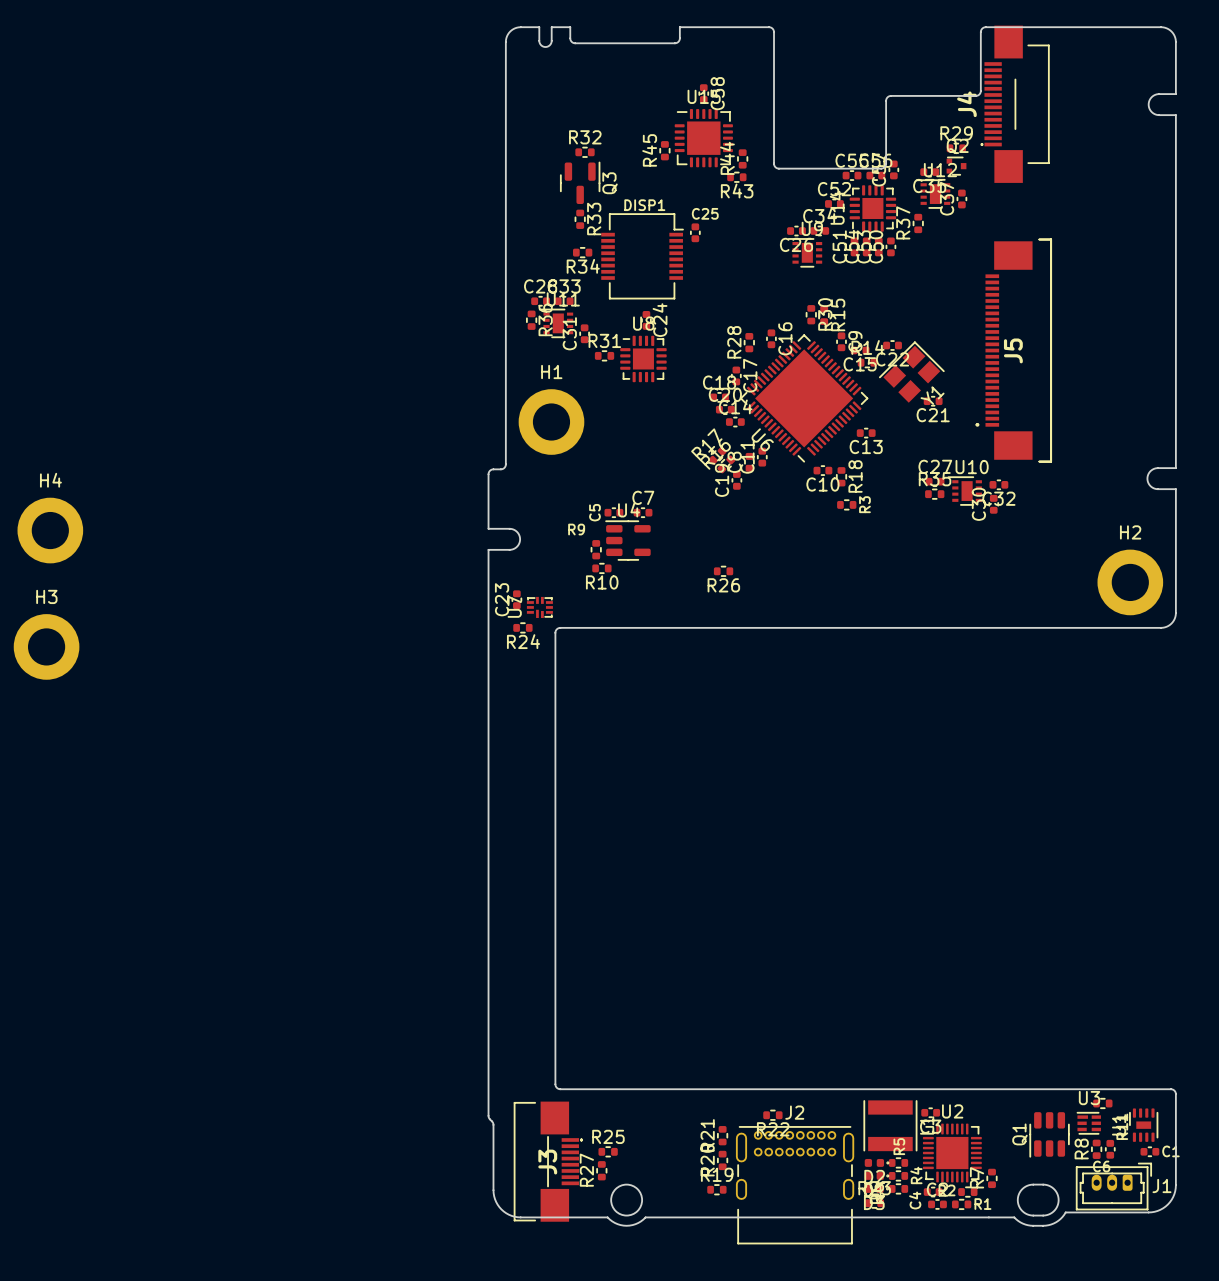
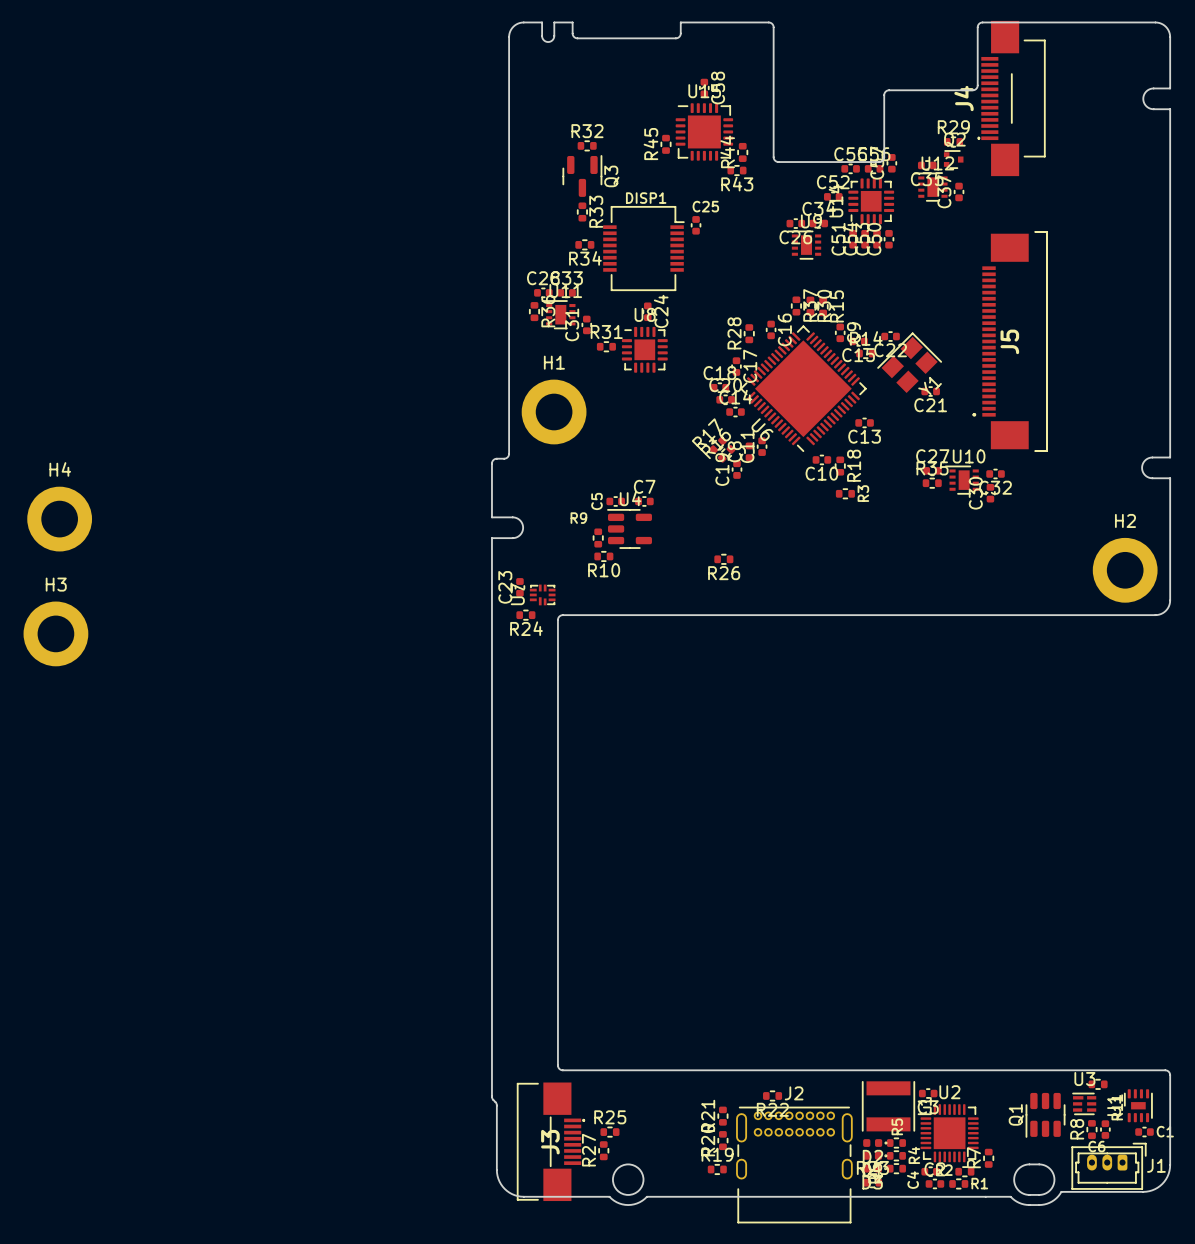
R37 name position: R37 (903, 222) -> R37 (810, 305)
R37 position: (918, 223) -> (796, 306)

